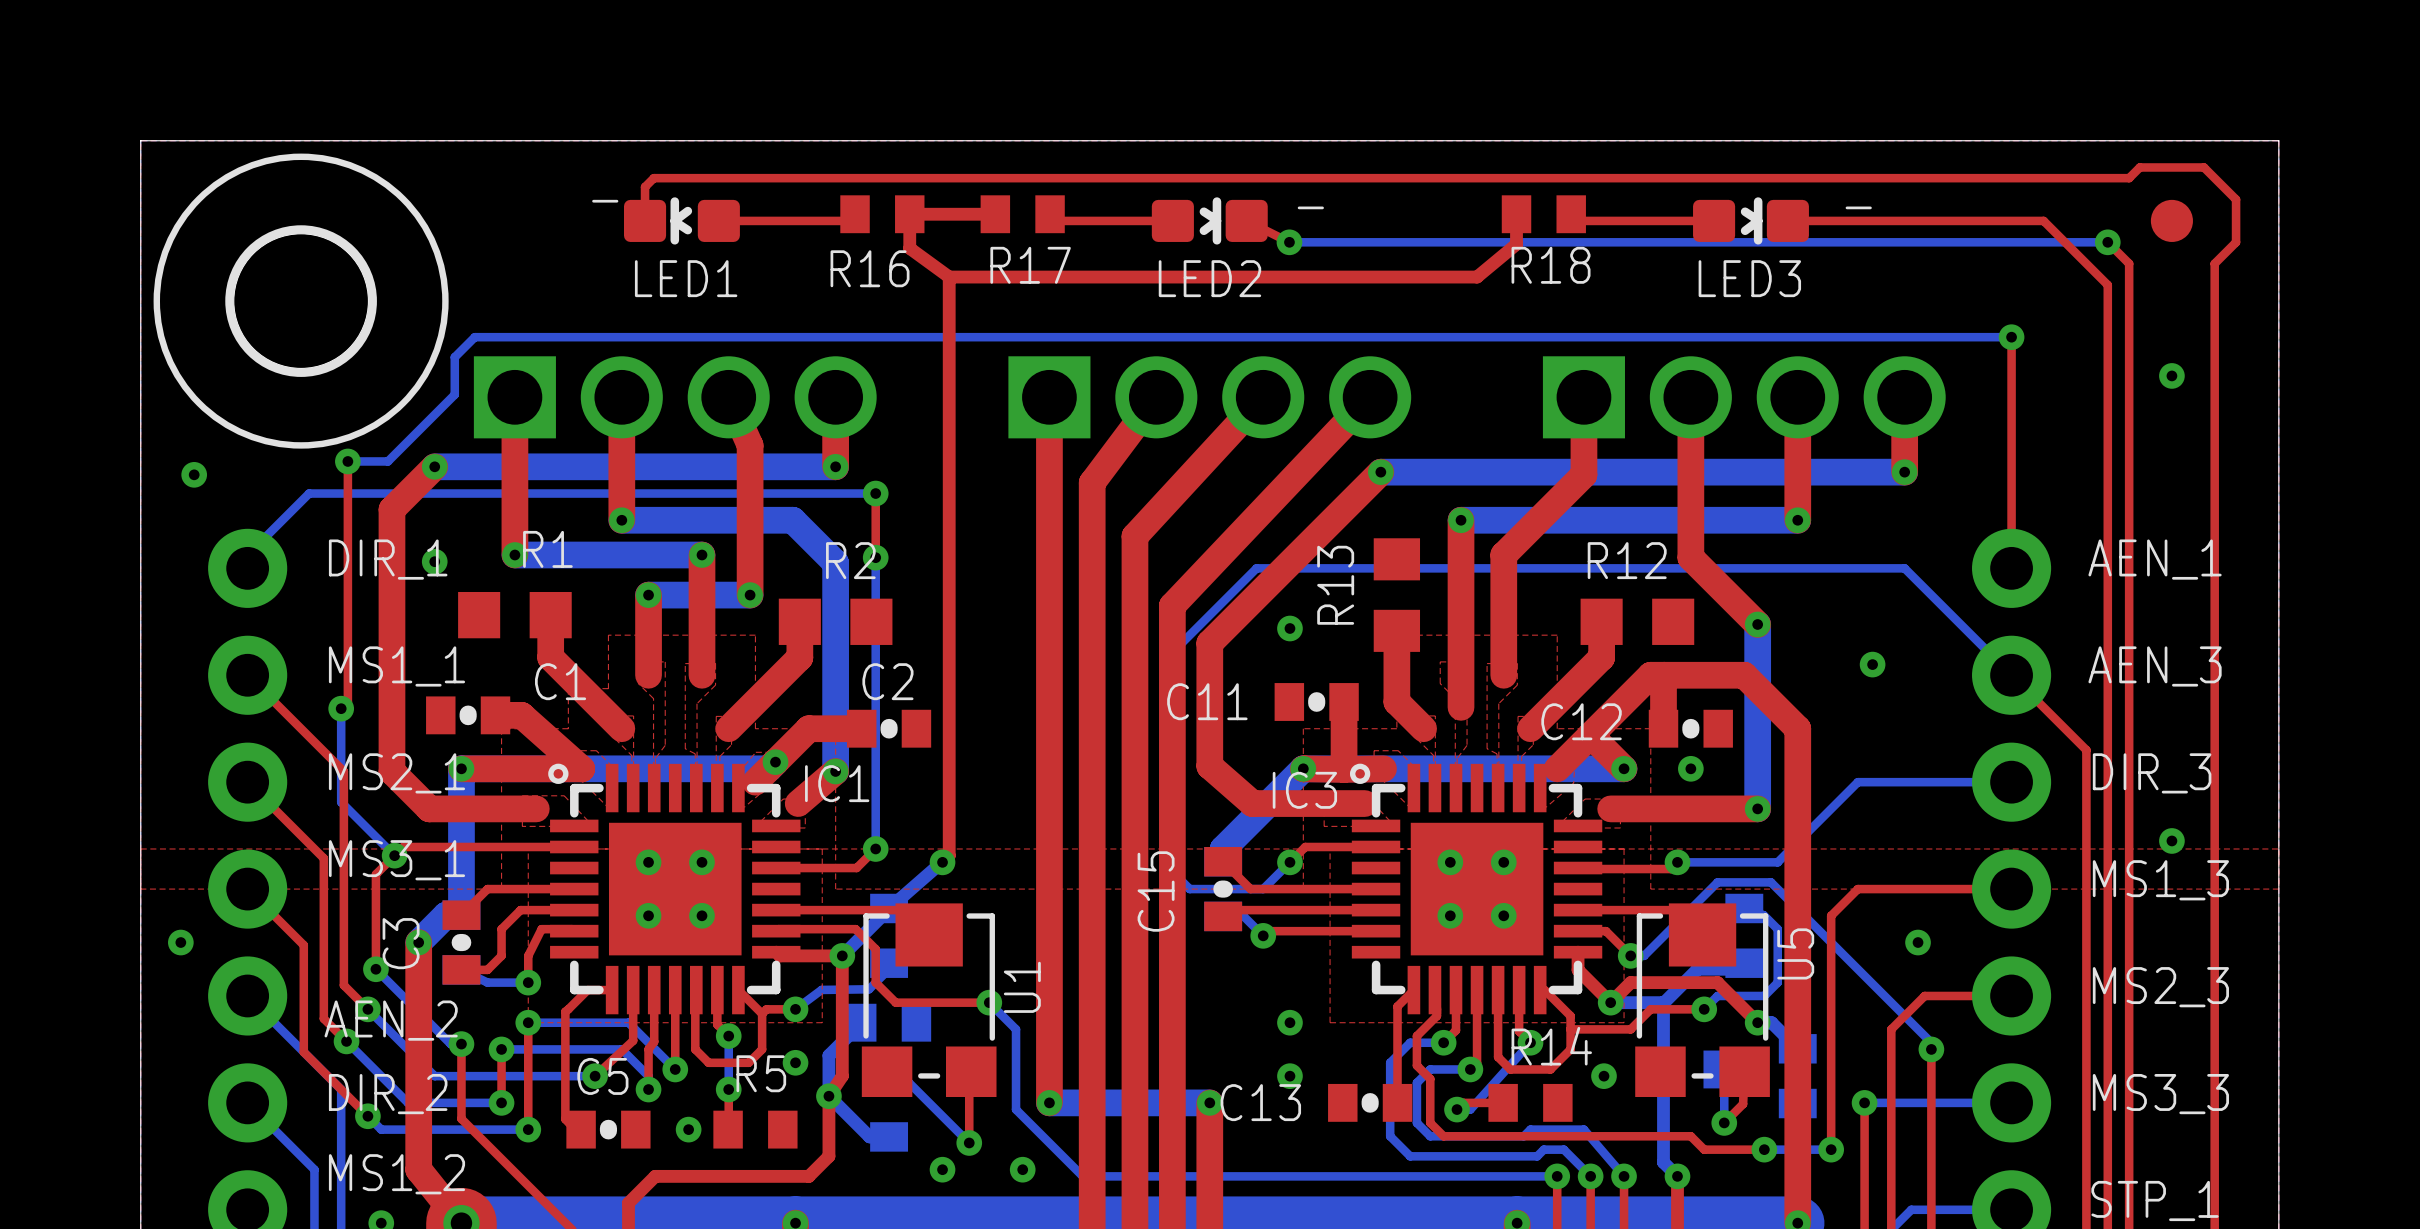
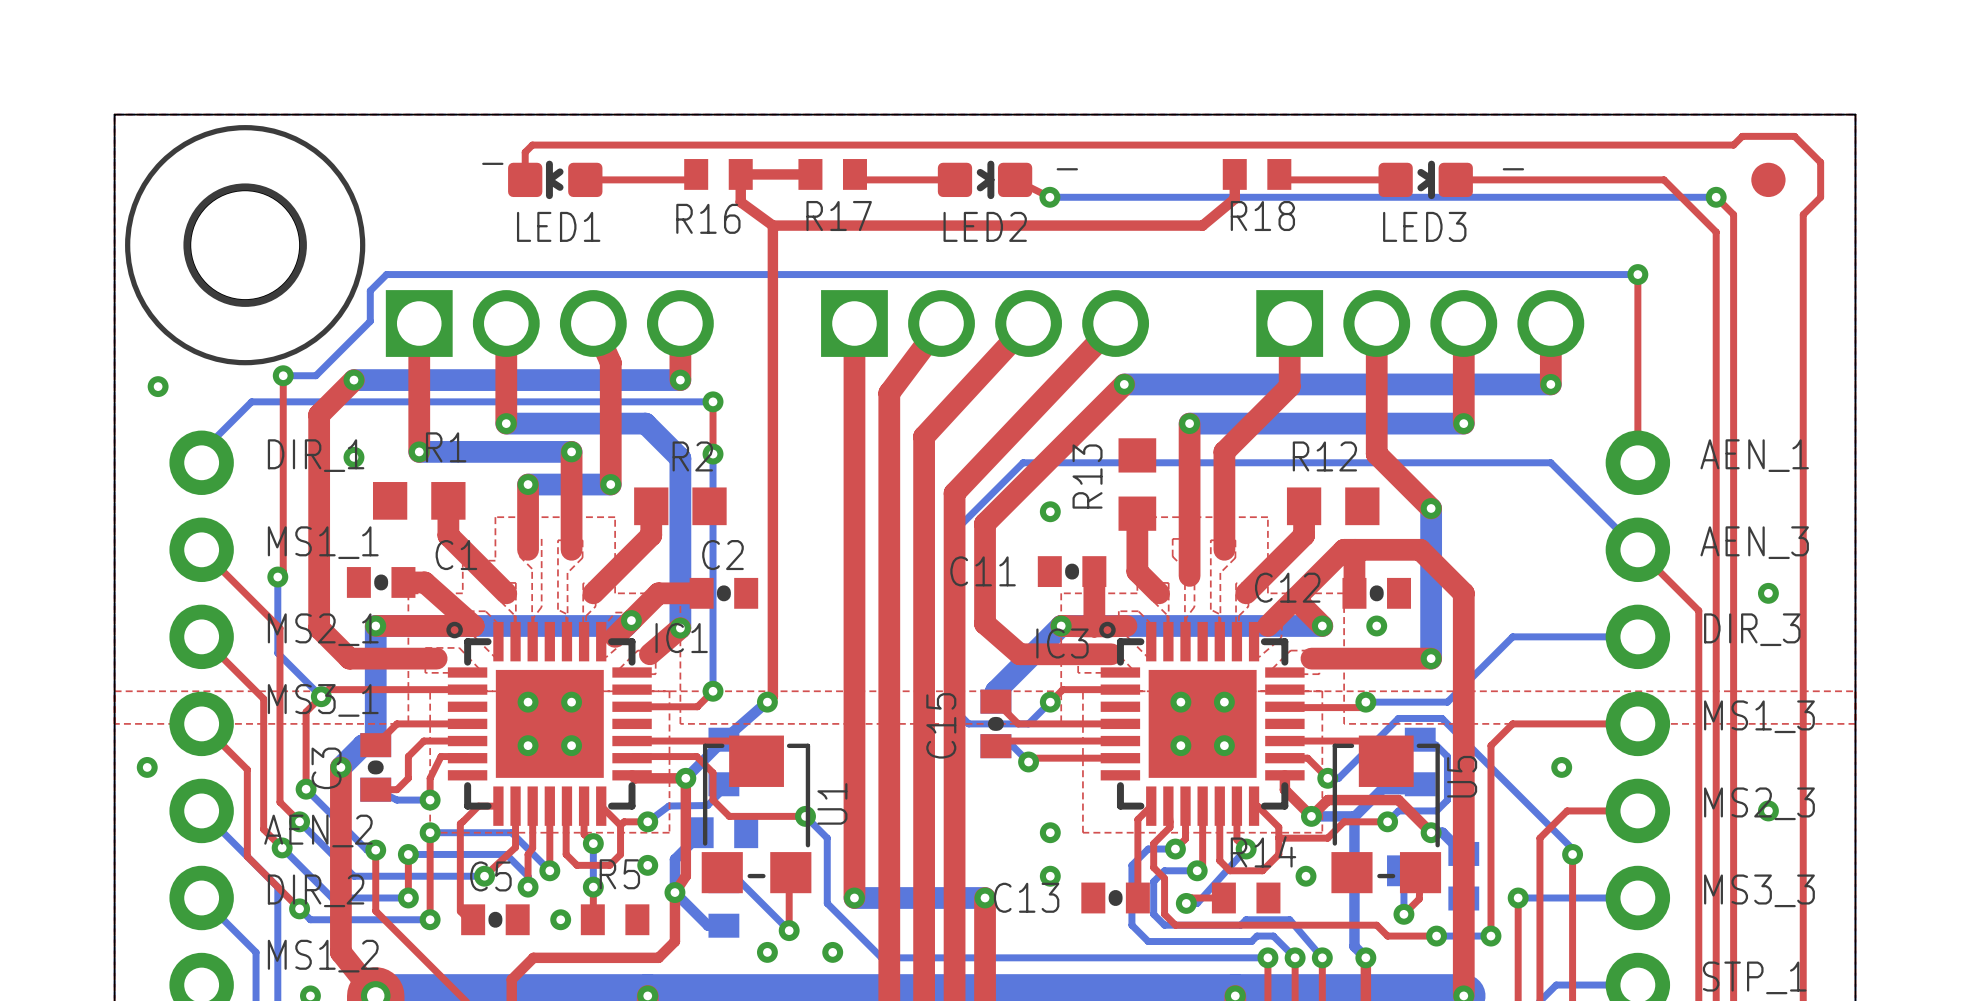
via: (2171, 375) -> none
via: (1872, 664) -> none
via: none -> (1768, 593)
via: (2171, 840) -> none
via: none -> (1768, 810)

